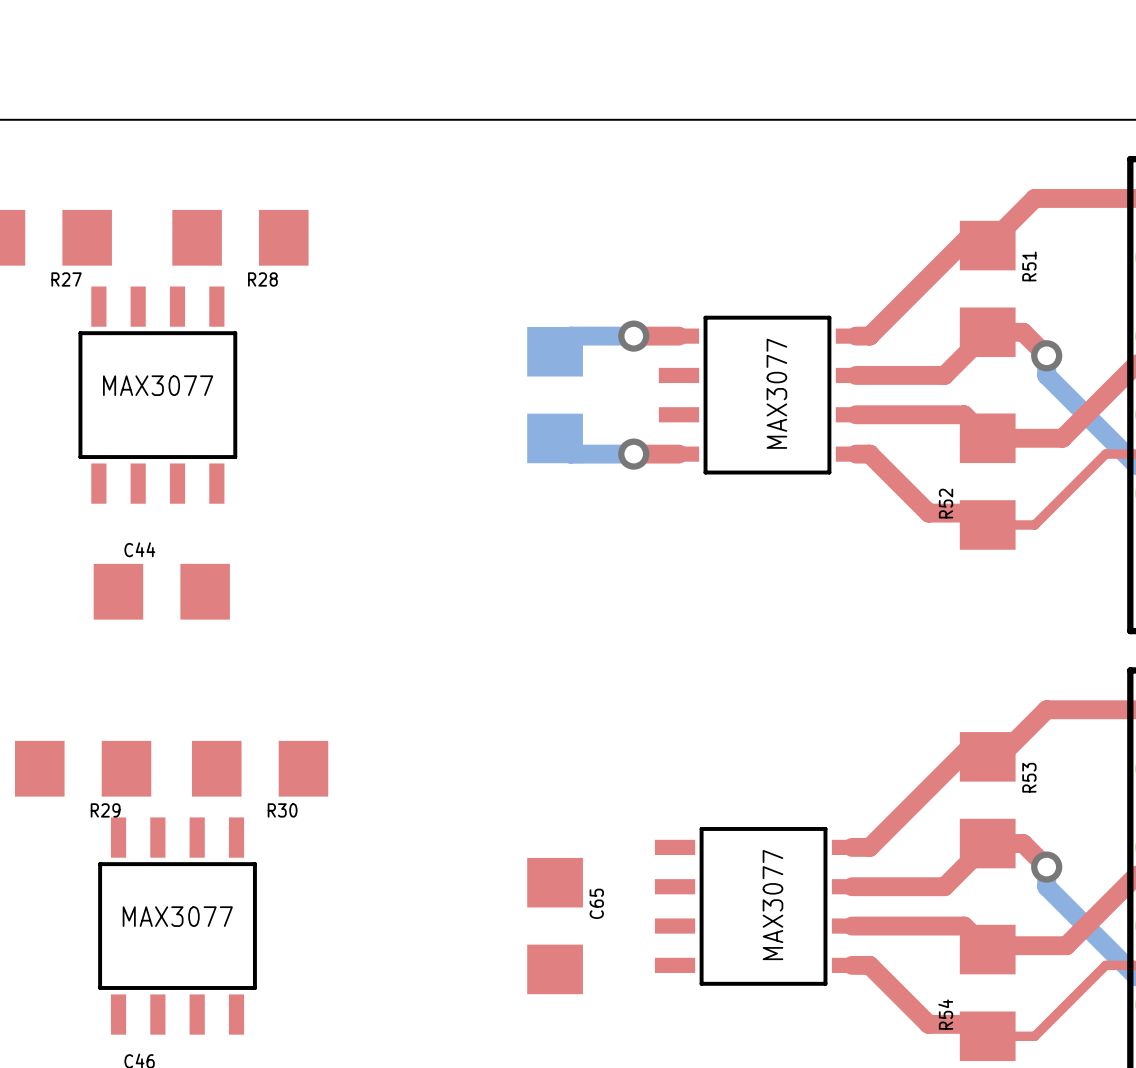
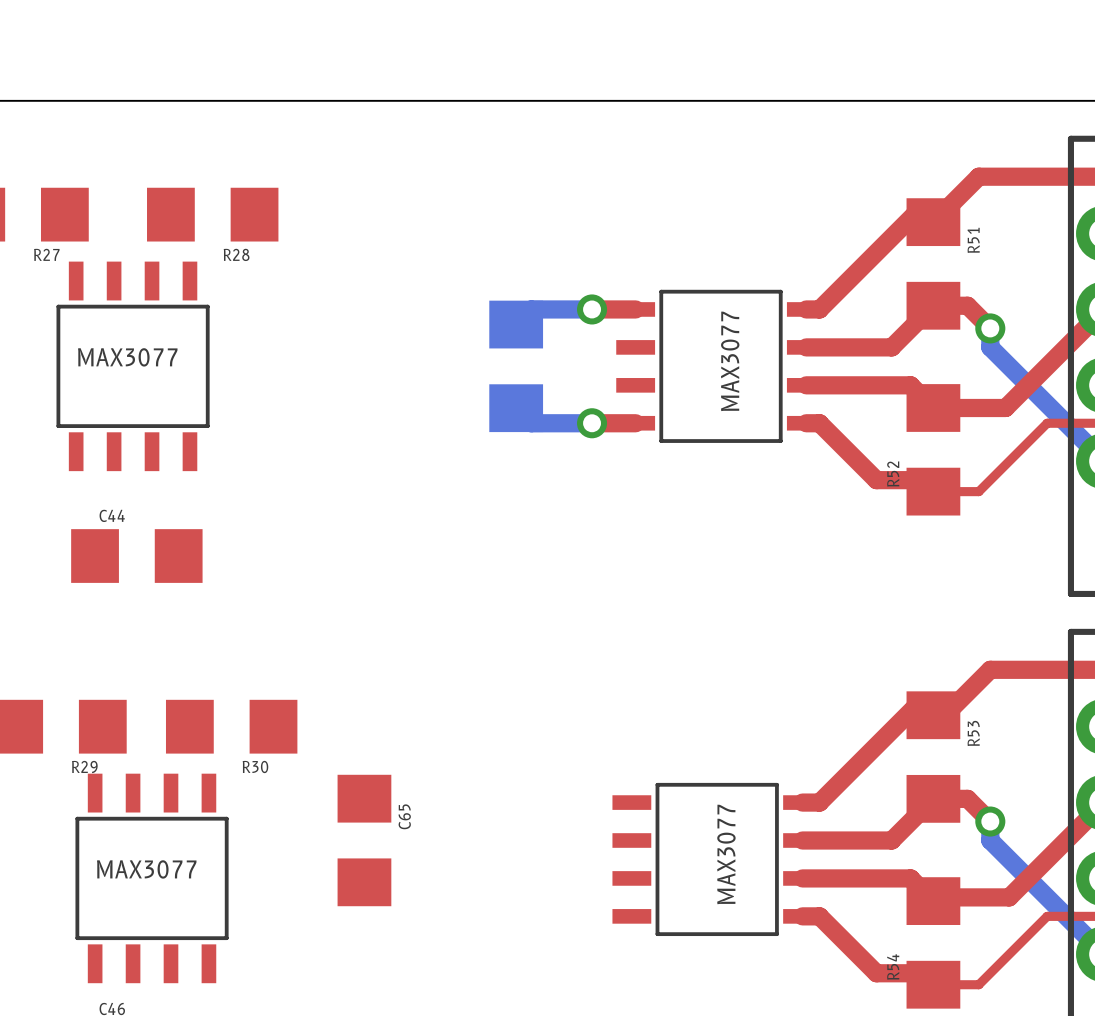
C65 position: (555, 926) -> (364, 840)

